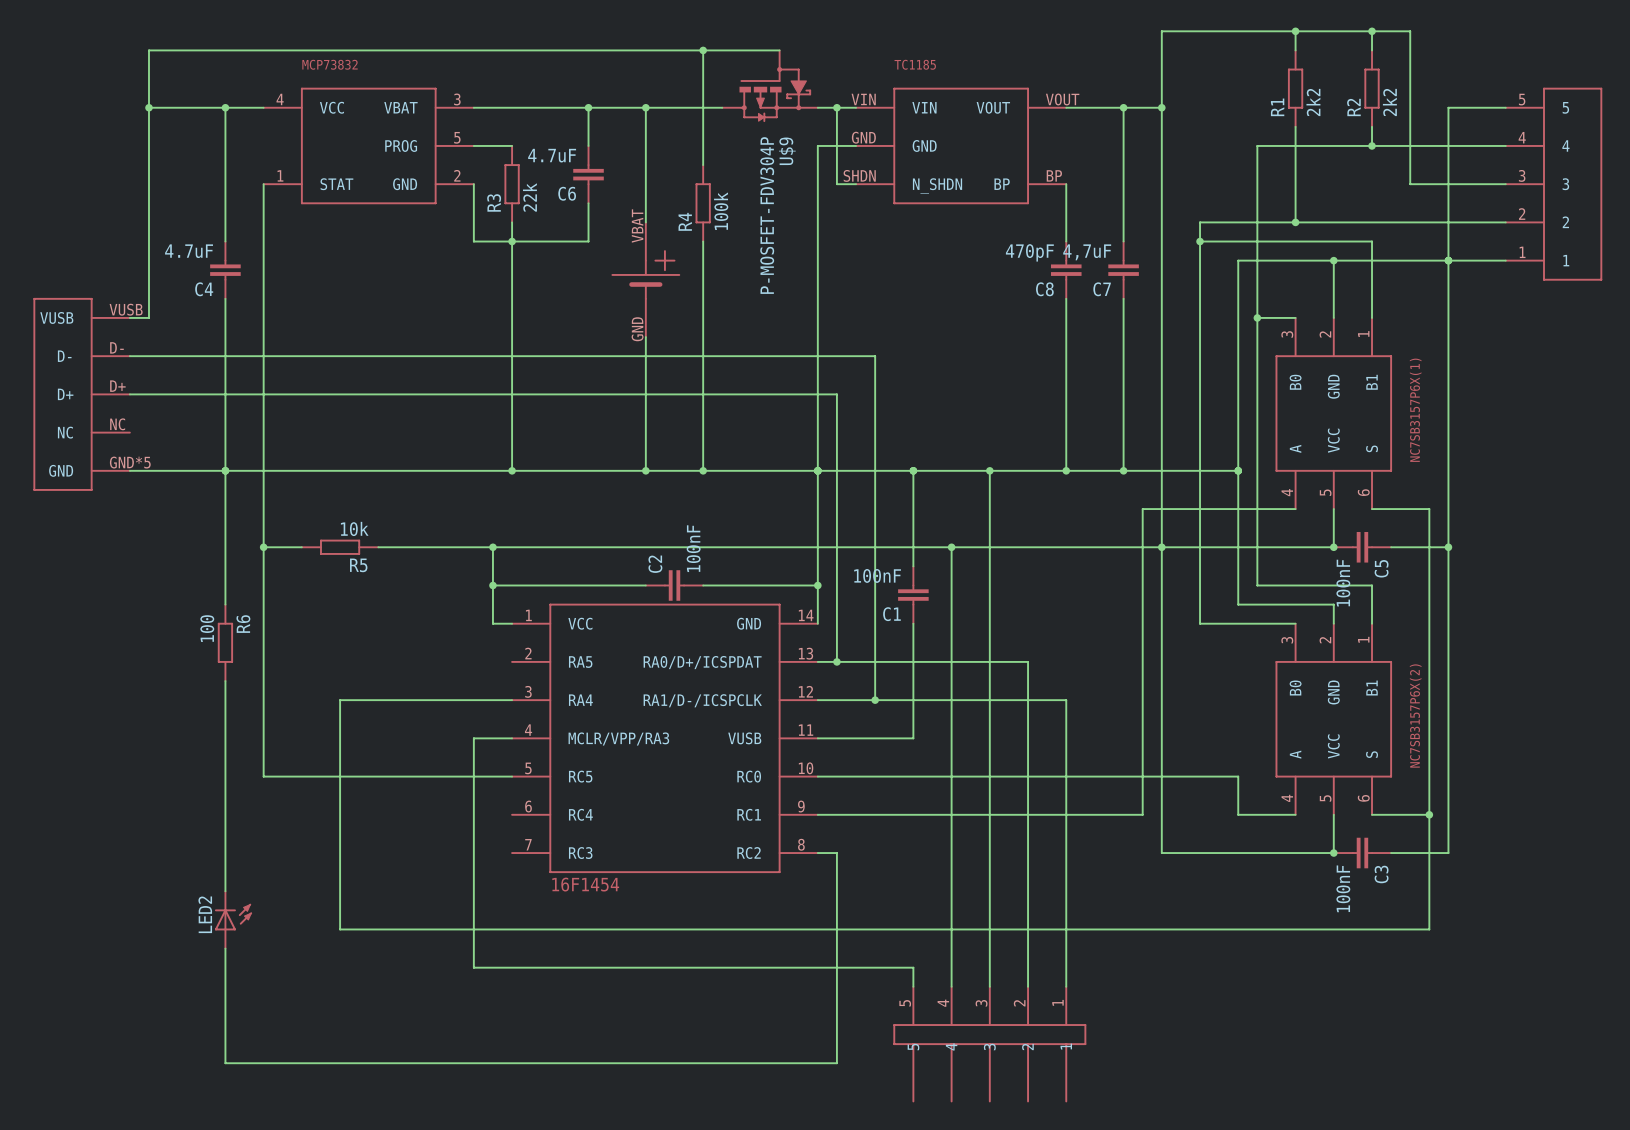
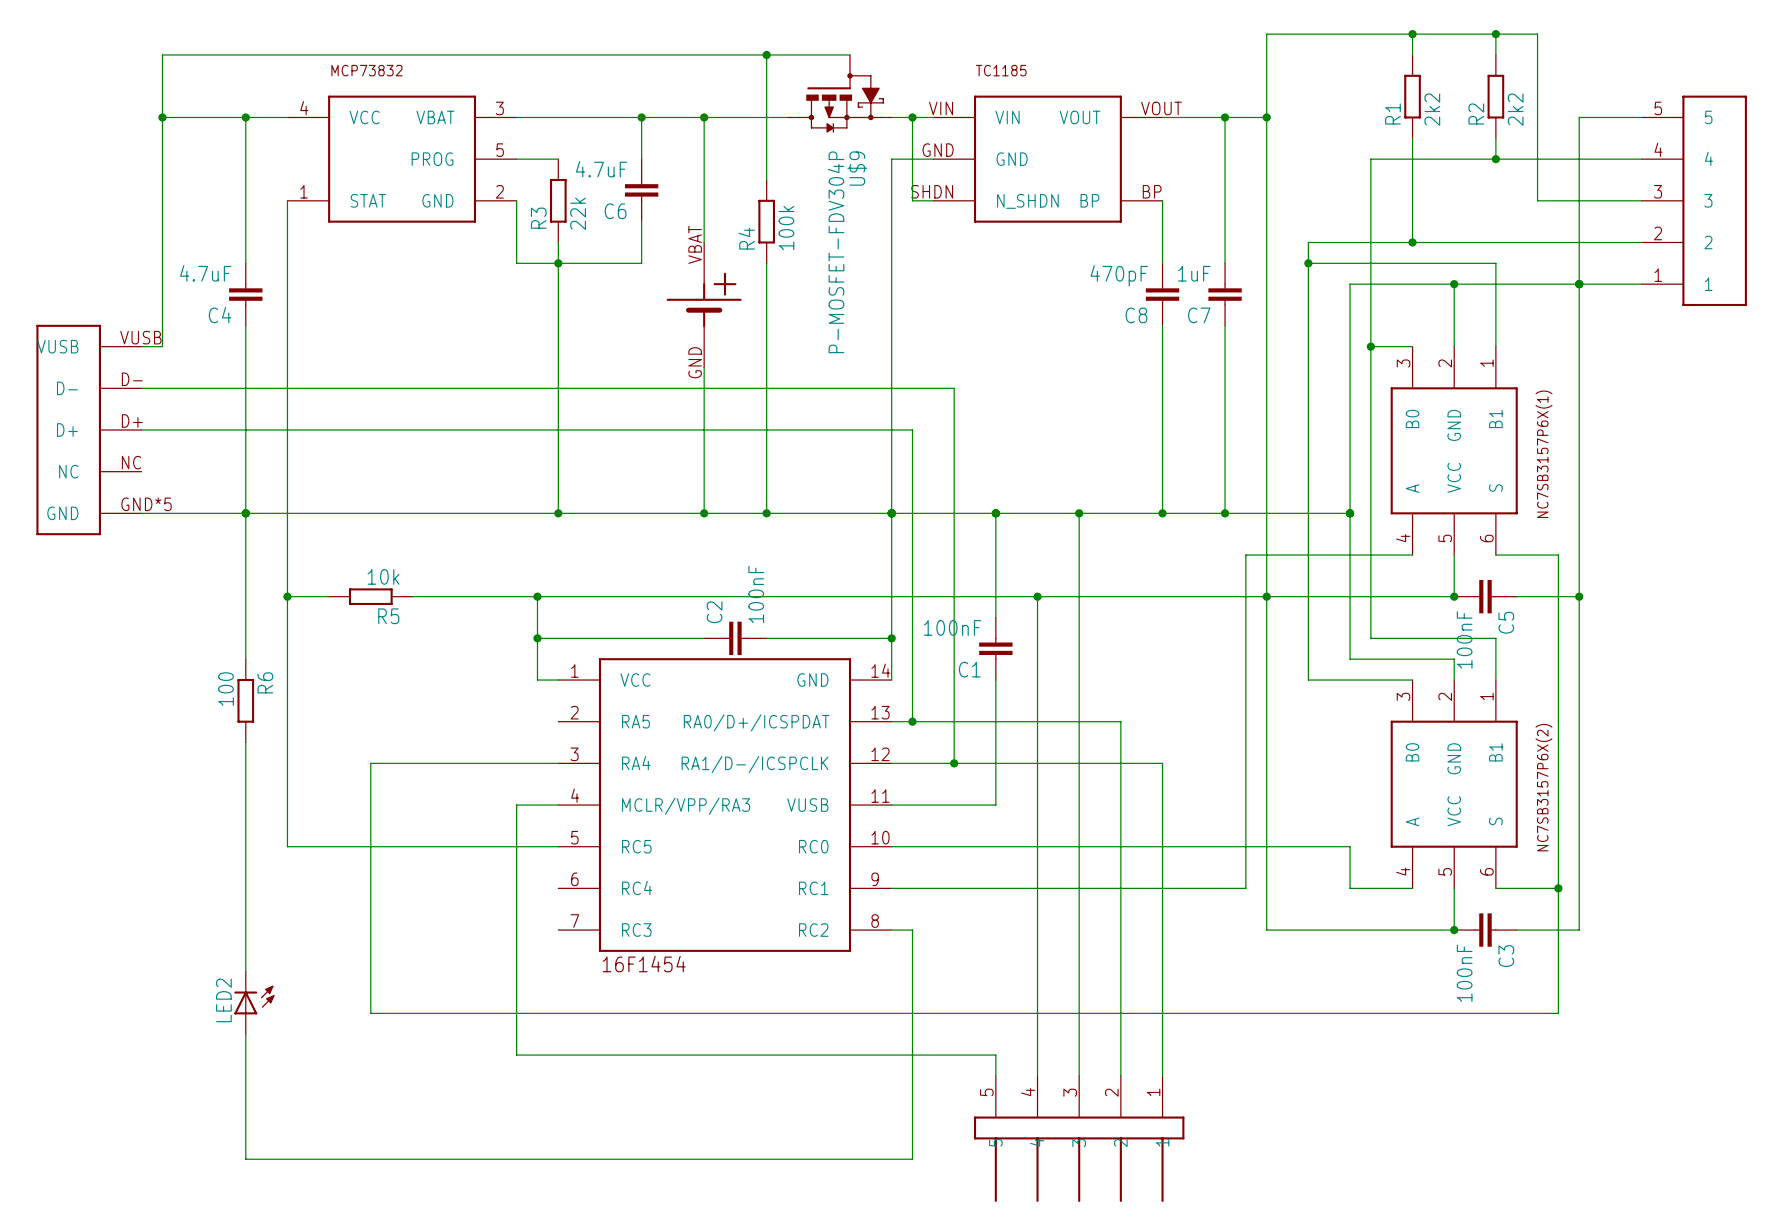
C7 value: 4,7uF (1087, 252) -> 1uF (1194, 273)

